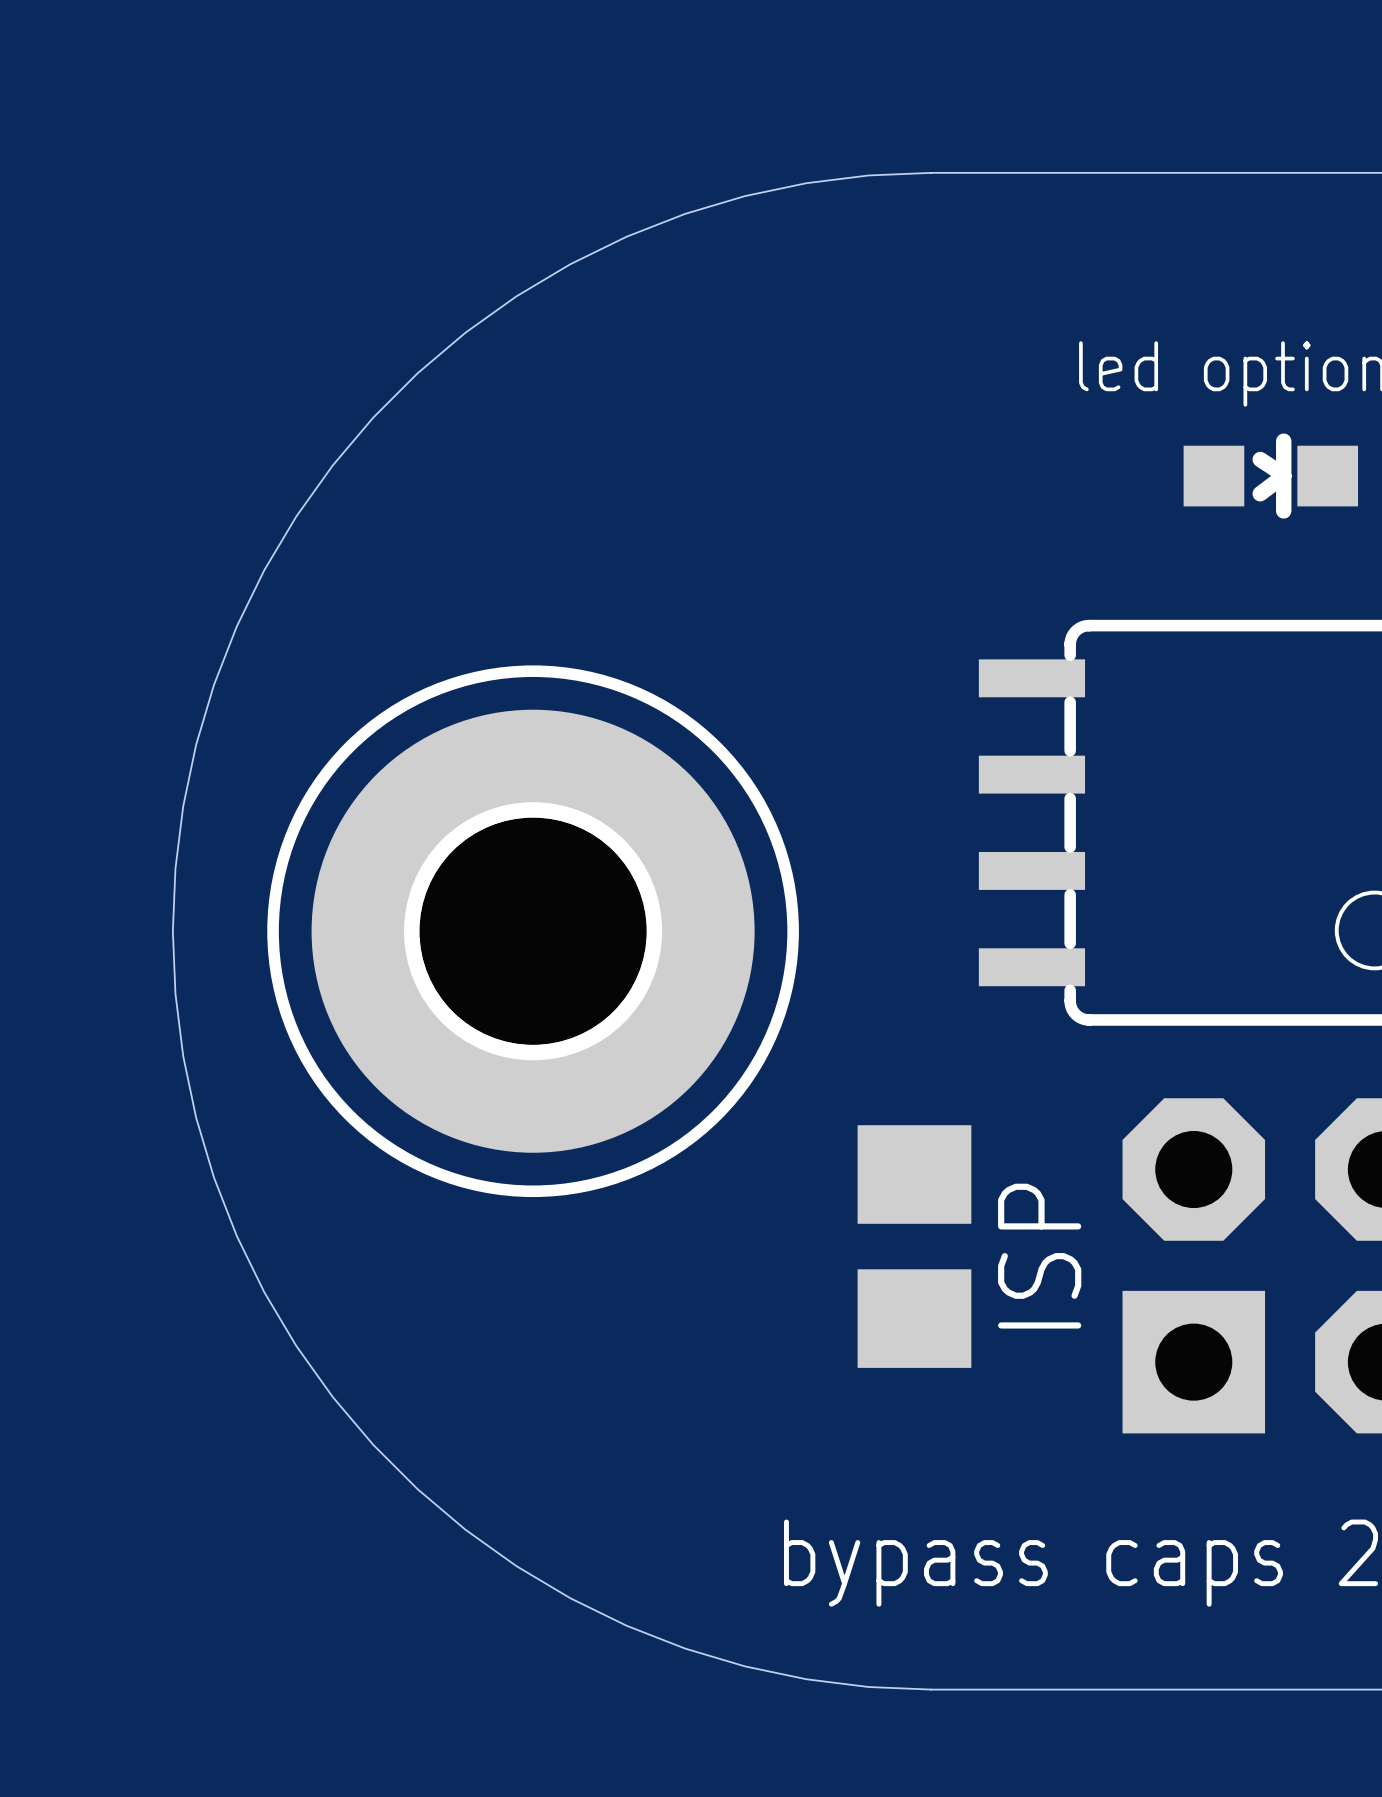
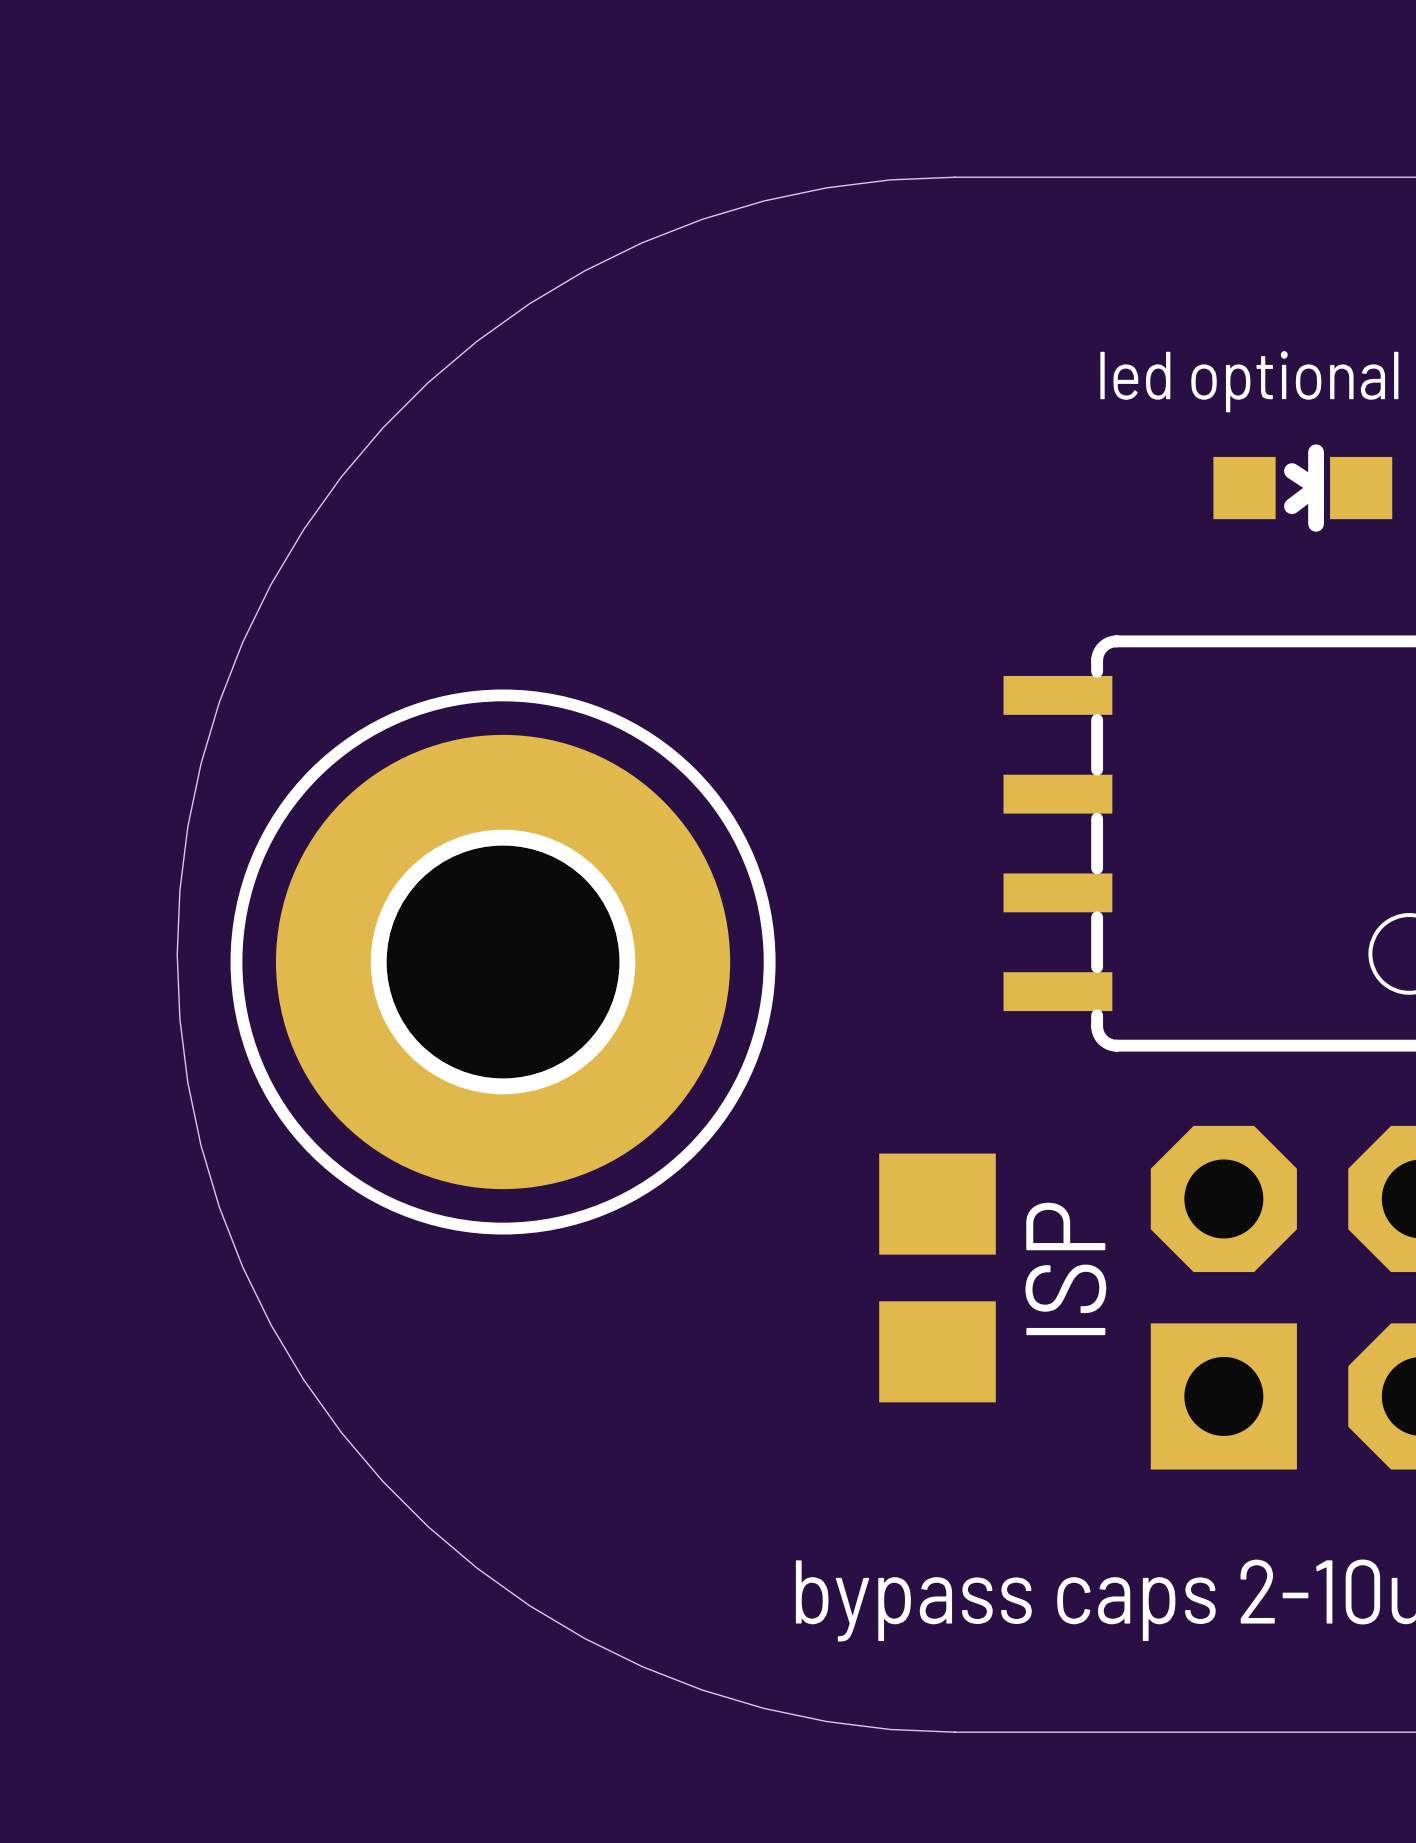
part position: (533, 931) -> (503, 962)

